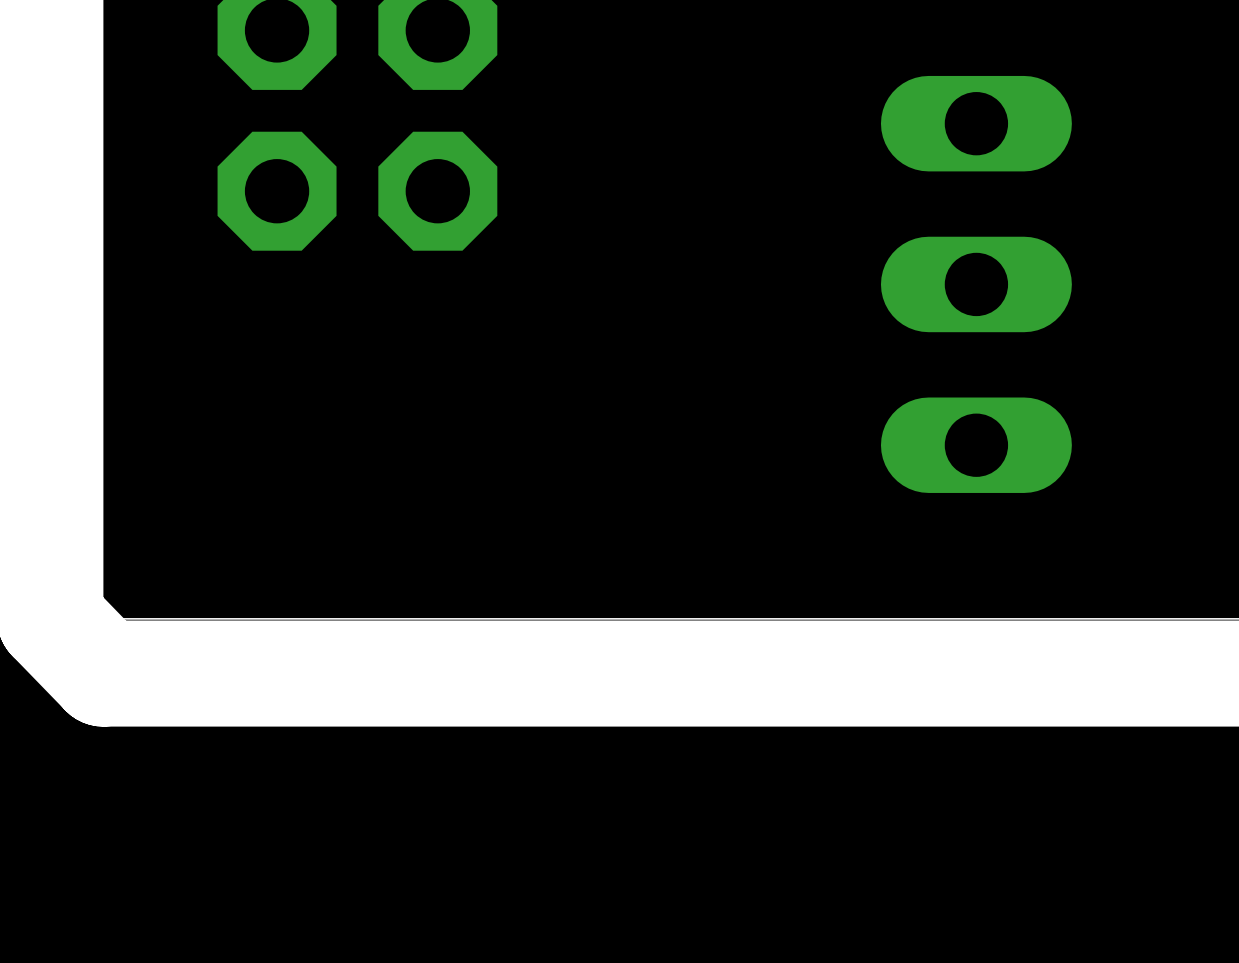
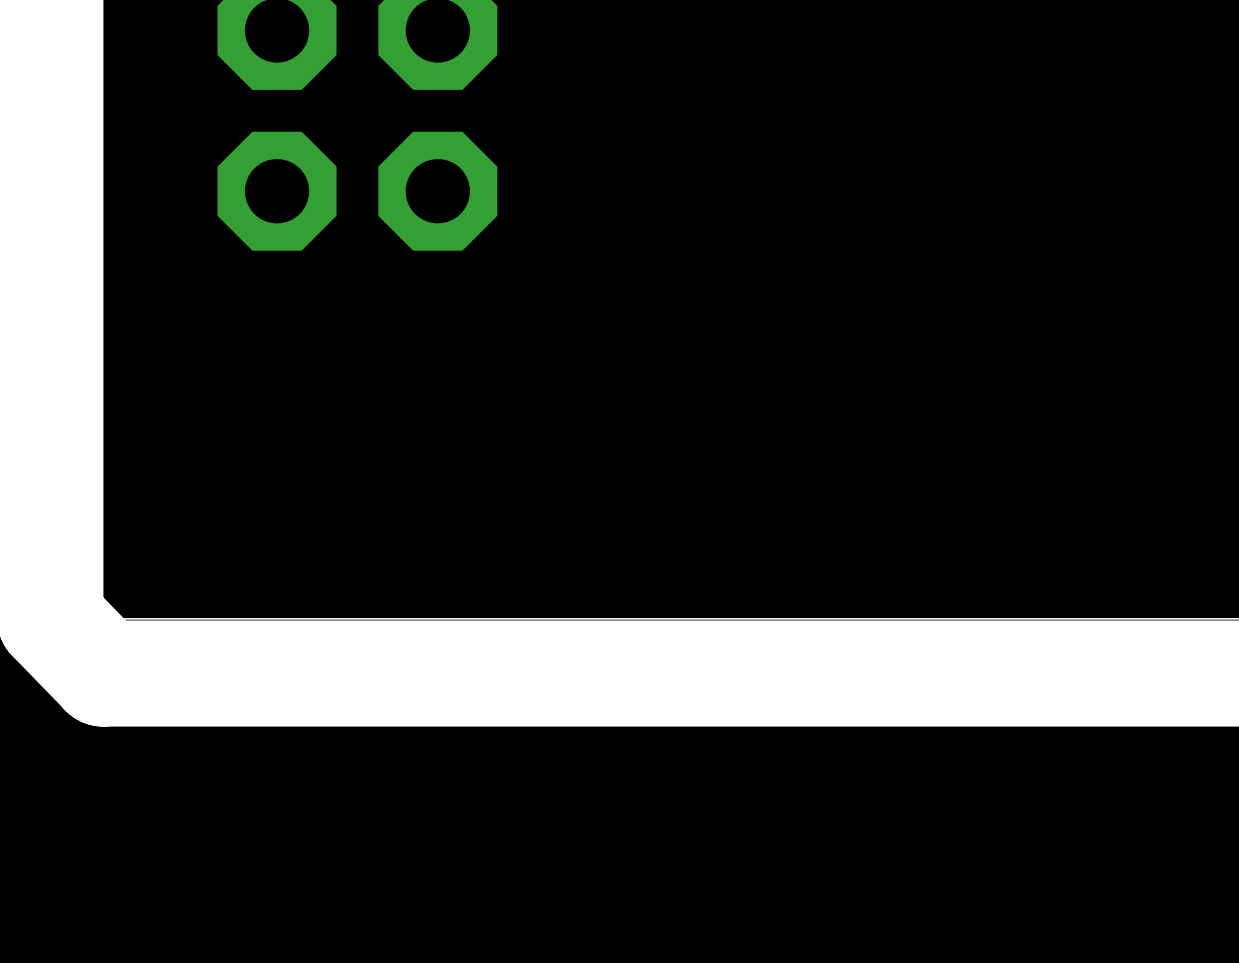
part: (976, 284) -> none

